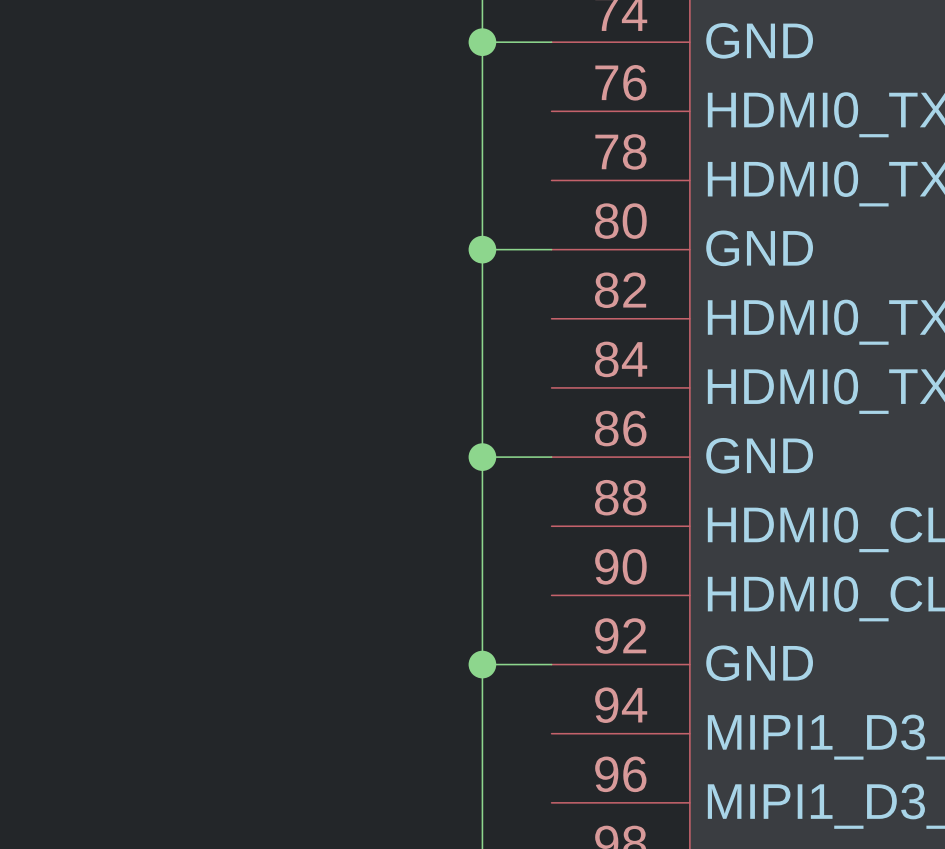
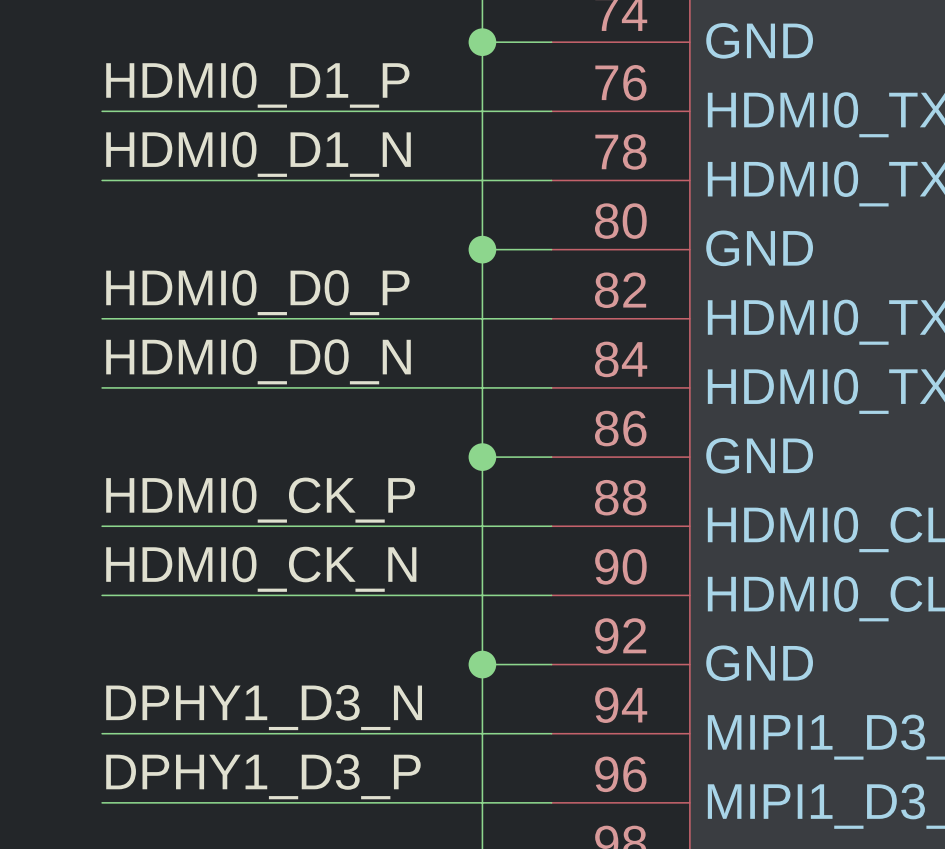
label: none -> HDMI0_D1_P (257, 85)
wire: none -> (102, 111) (551, 111)
label: none -> HDMI0_D1_N (258, 154)
wire: none -> (102, 180) (551, 180)
label: none -> HDMI0_D0_P (257, 292)
wire: none -> (102, 318) (551, 318)
label: none -> HDMI0_D0_N (258, 361)
wire: none -> (102, 387) (551, 387)
label: none -> HDMI0_CK_P (260, 500)
wire: none -> (102, 526) (551, 526)
label: none -> HDMI0_CK_N (261, 569)
wire: none -> (102, 595) (551, 595)
label: none -> DPHY1_D3_N (264, 707)
wire: none -> (102, 733) (551, 733)
label: none -> DPHY1_D3_P (263, 776)
wire: none -> (102, 802) (551, 802)

